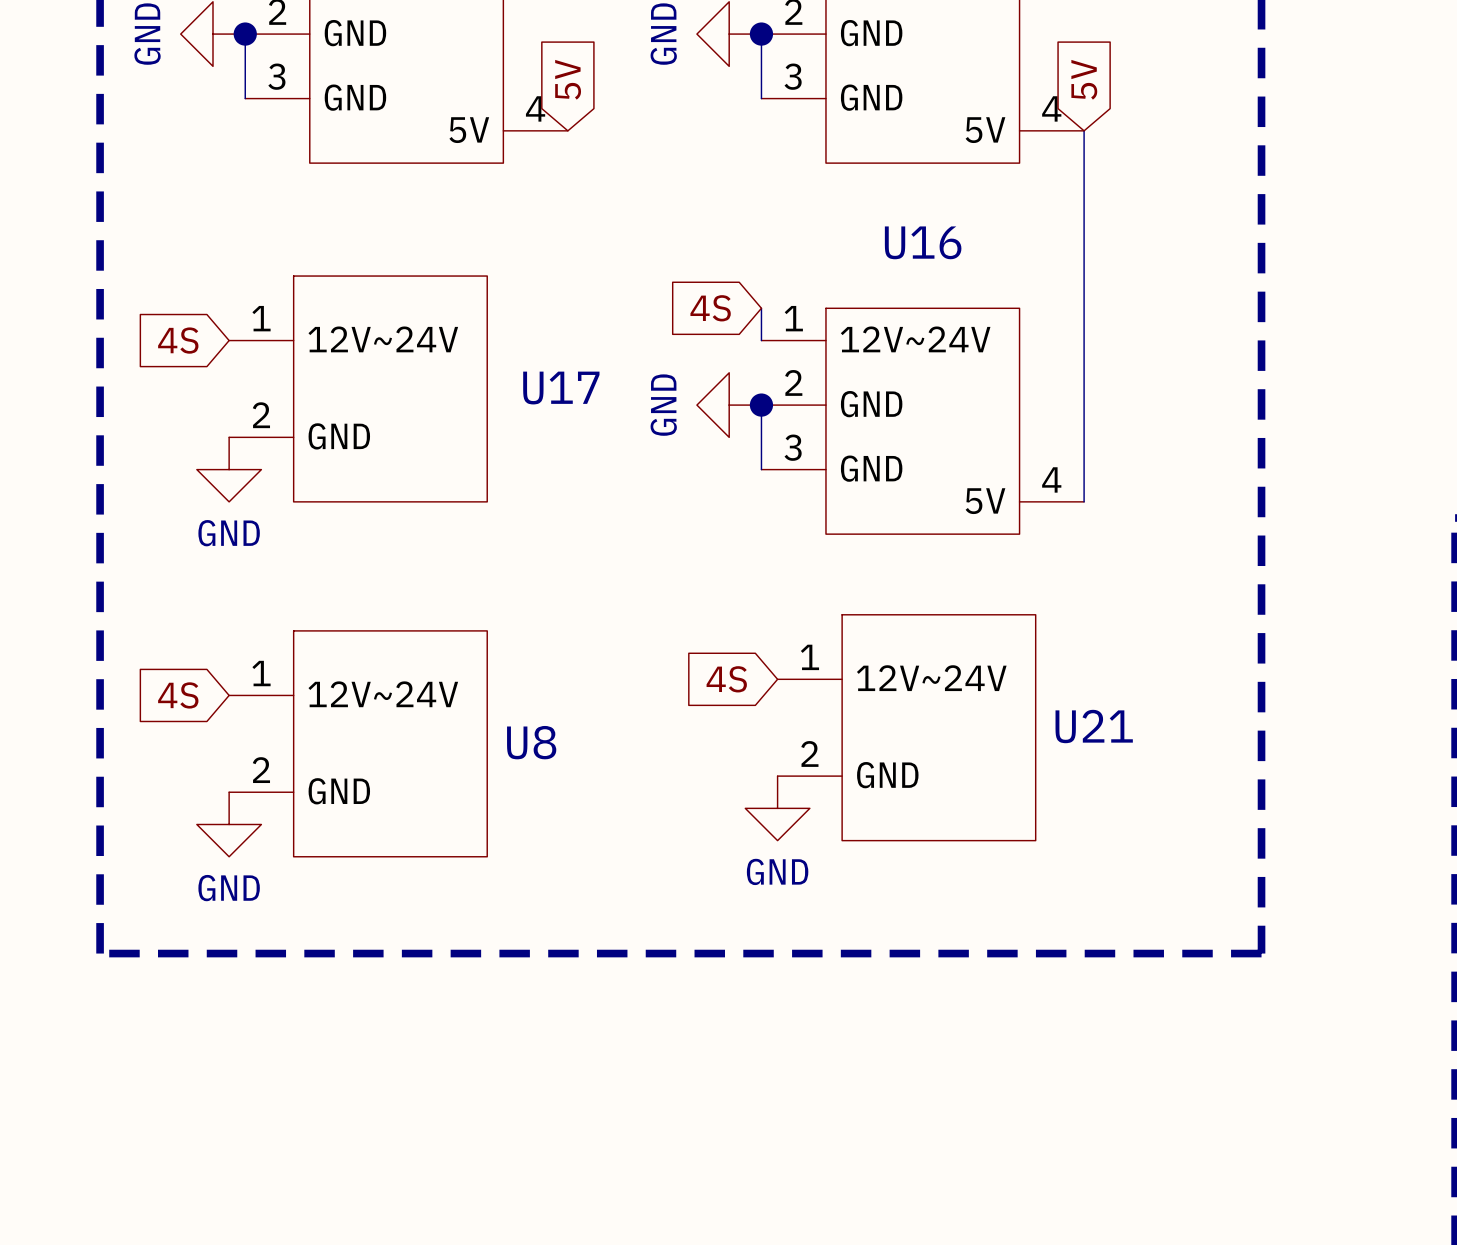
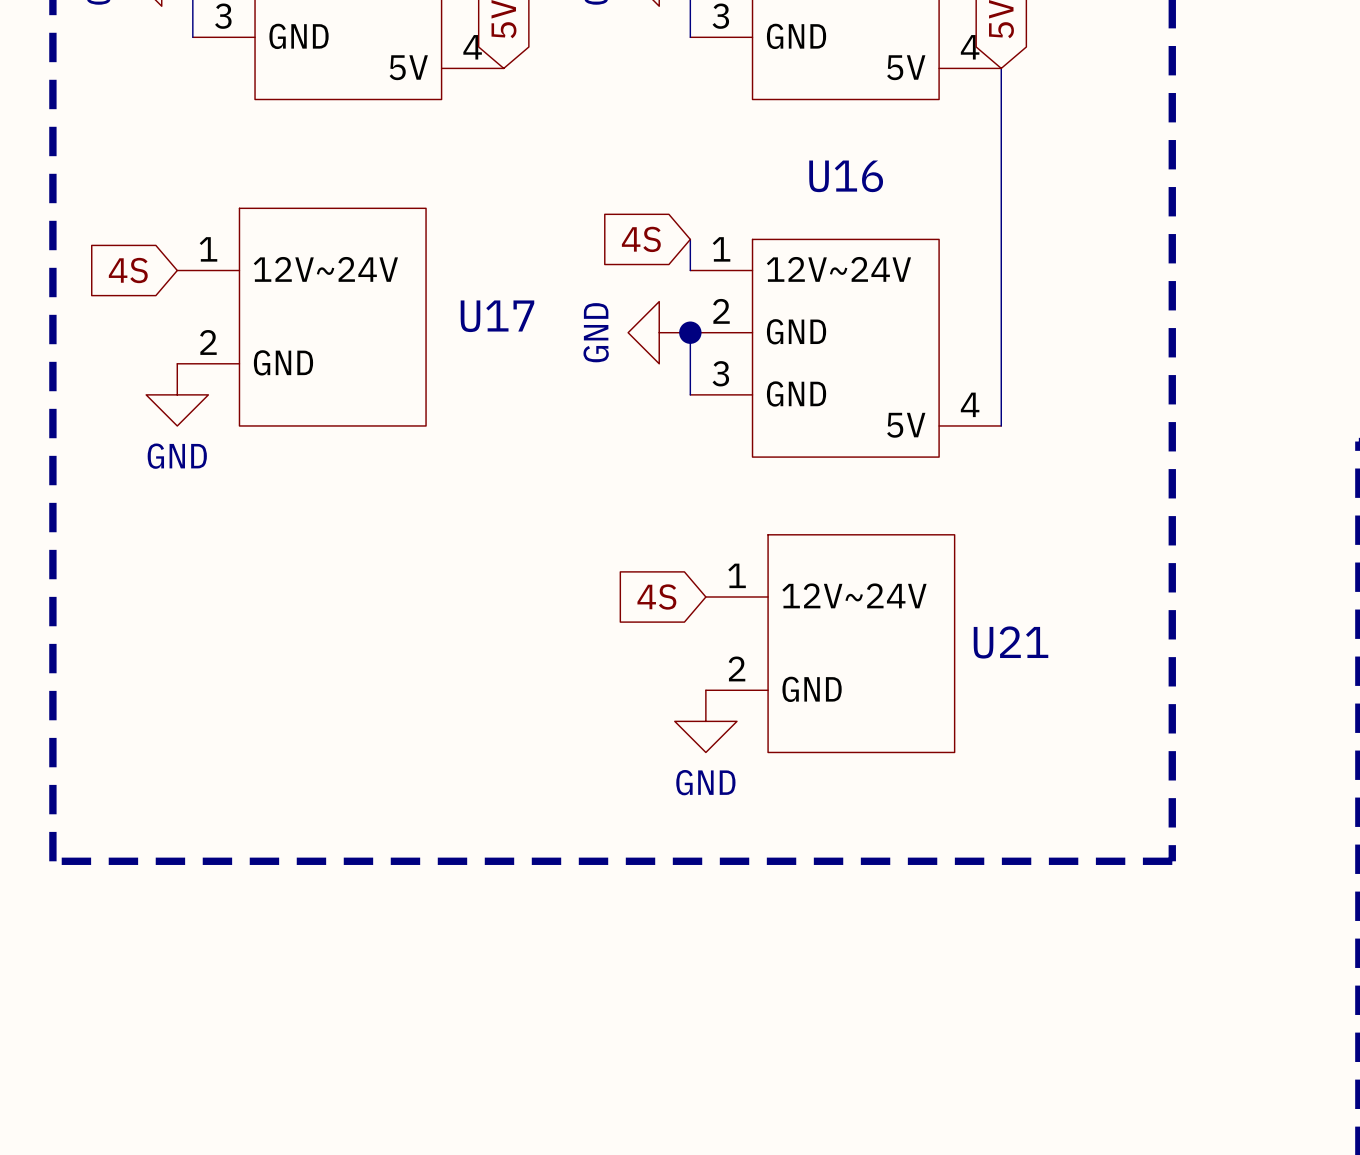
global label: 4S (178, 695) -> none
U8: (358, 743) -> none
power symbol: GND (229, 824) -> none

